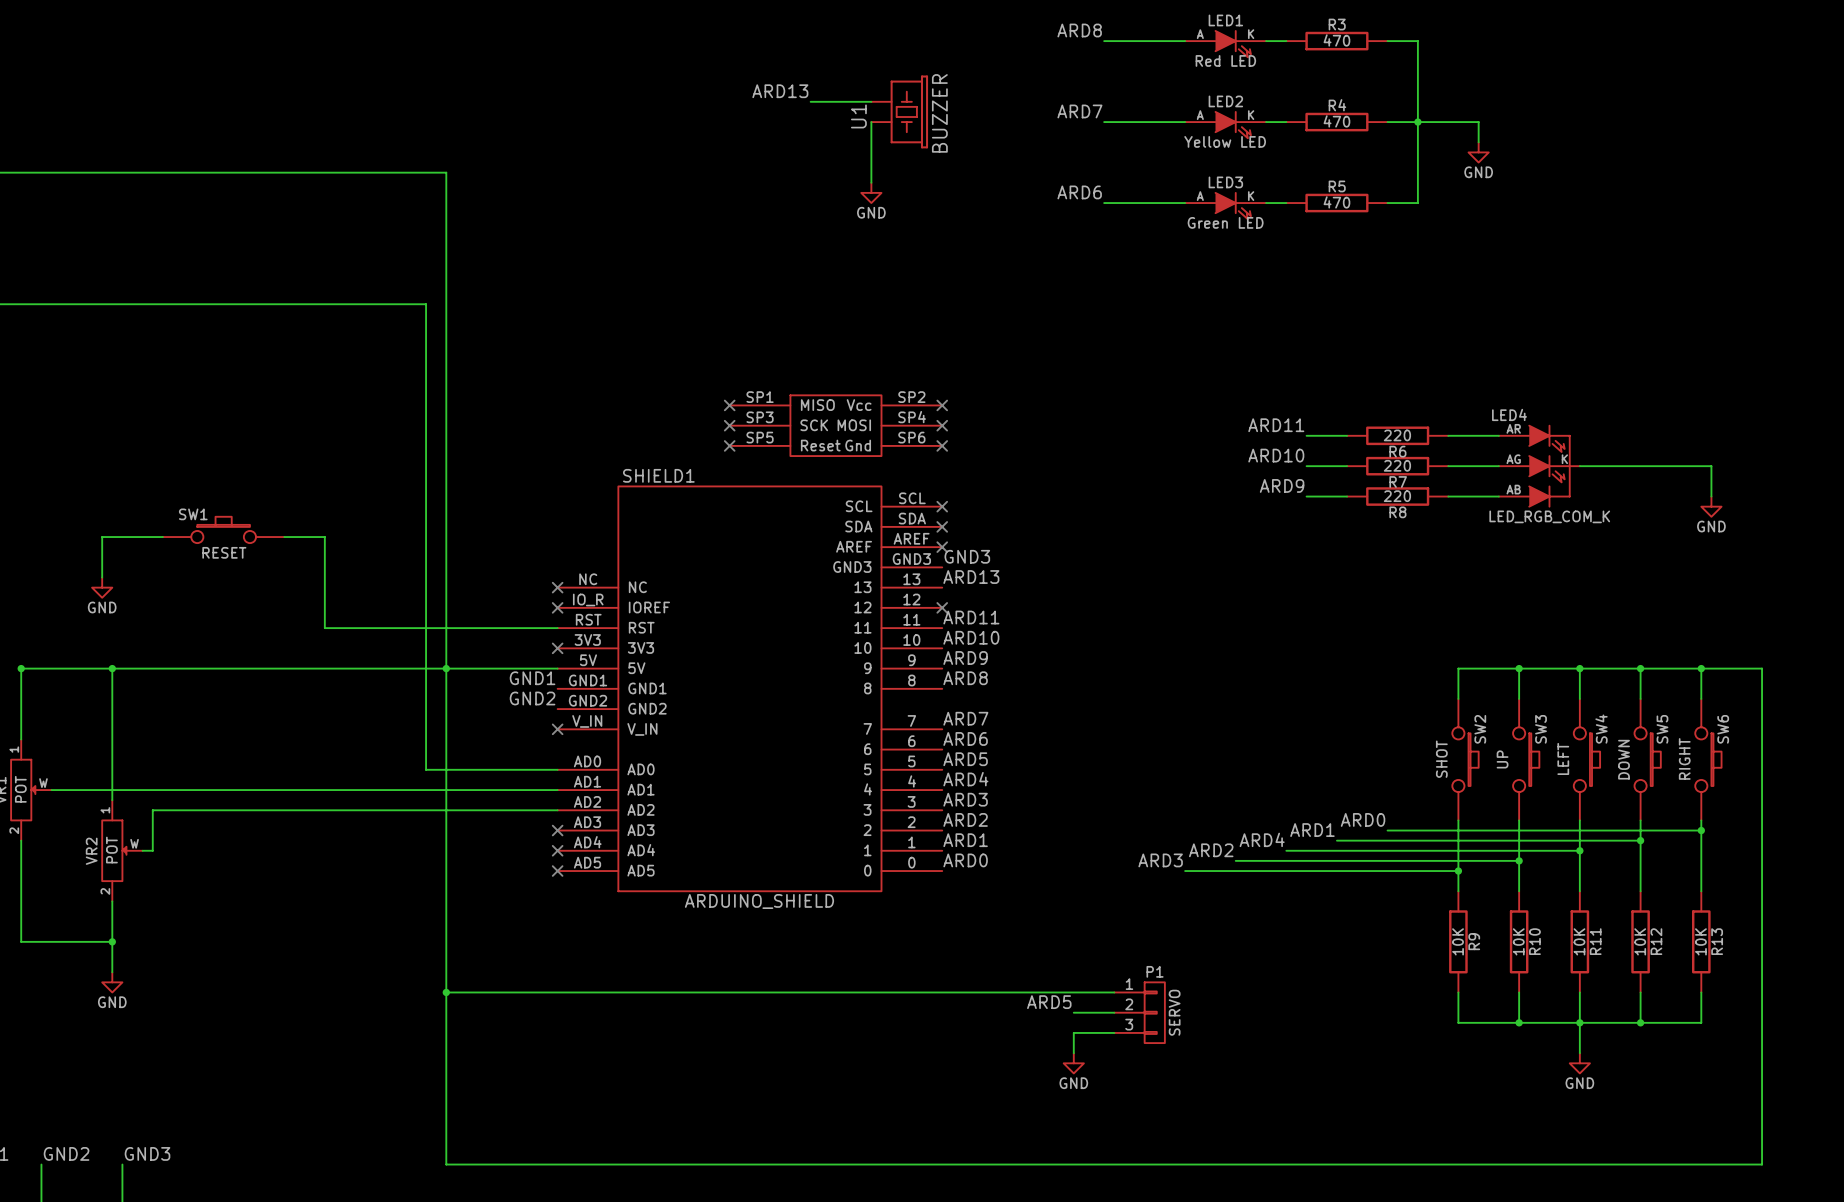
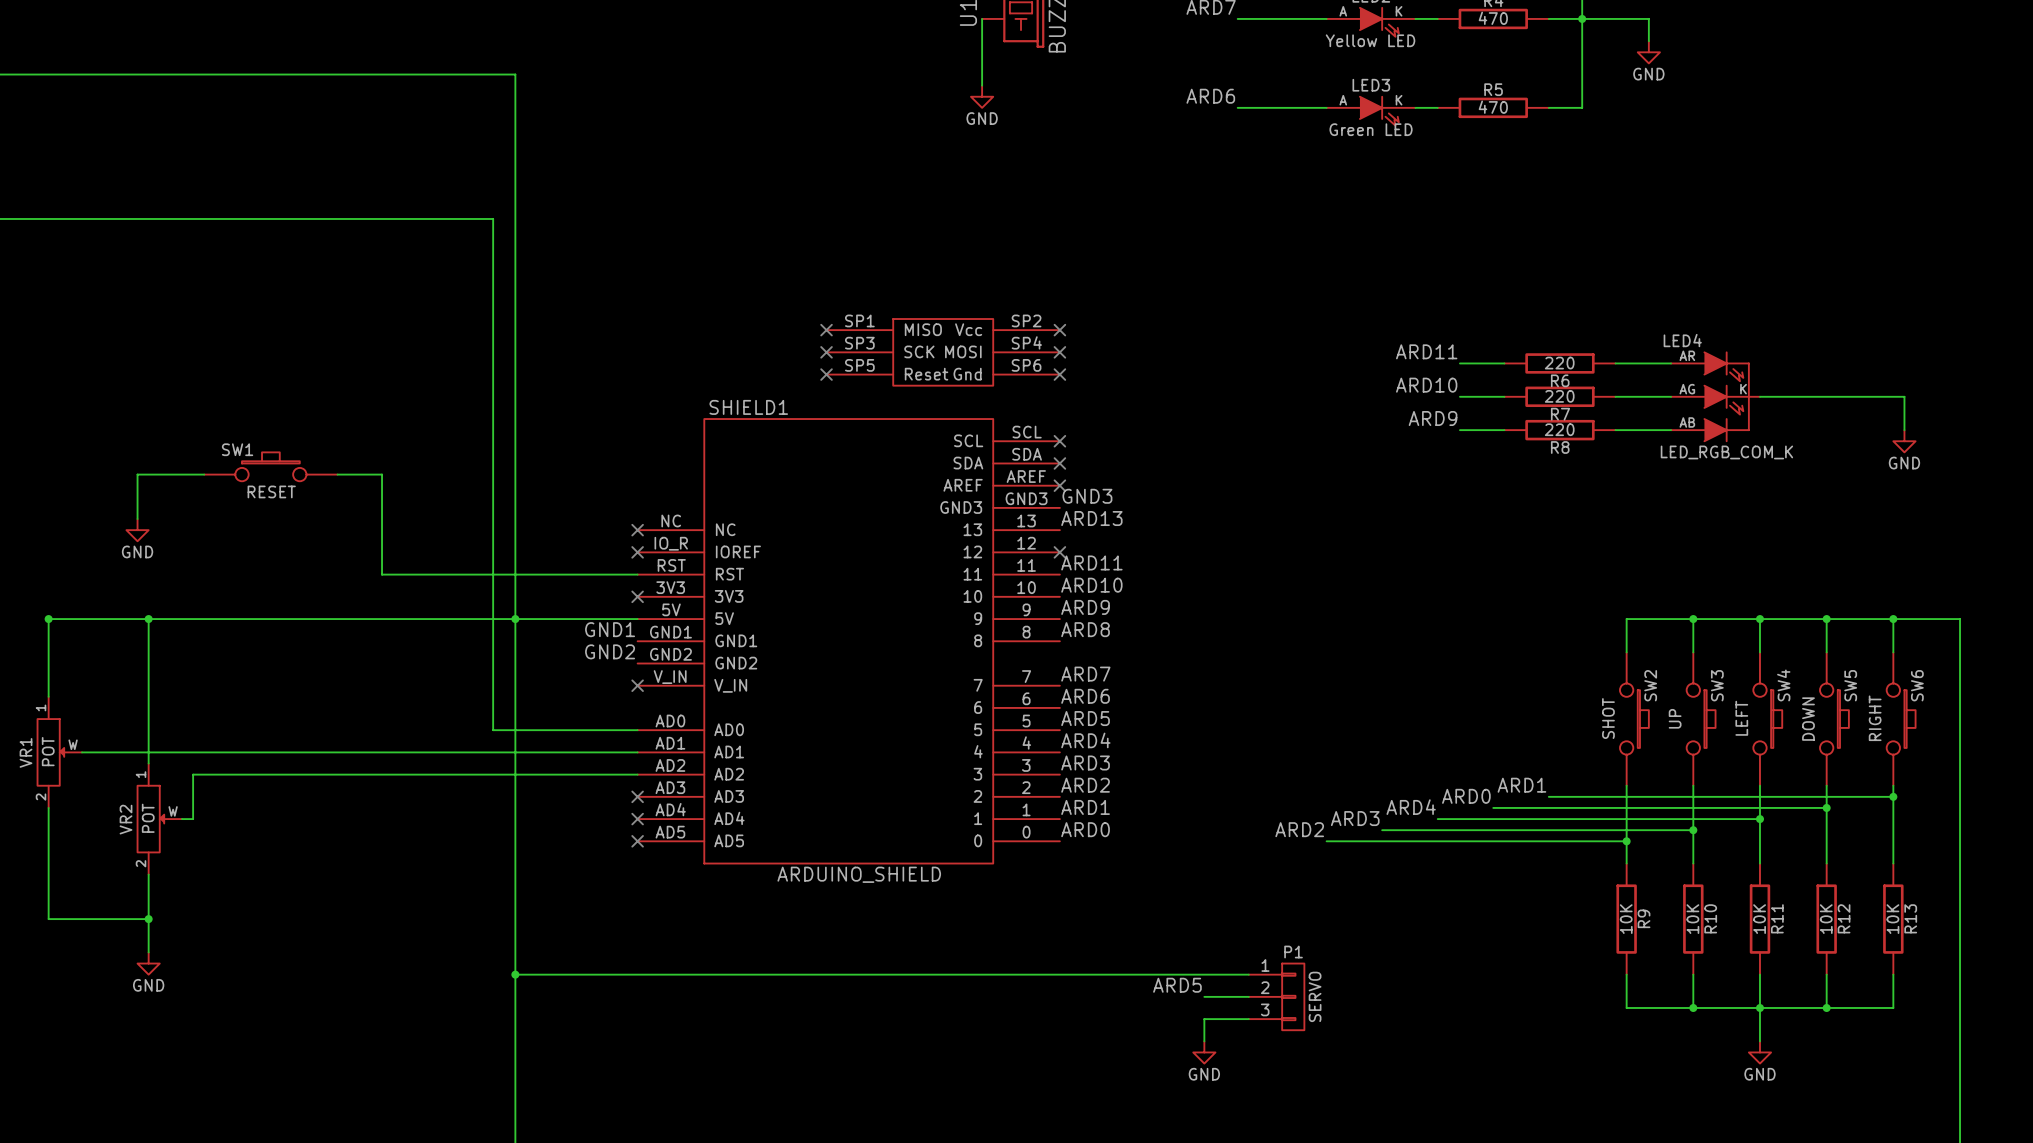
label: ARD0 (1363, 819) -> ARD1 (1521, 785)
label: ARD1 (1312, 830) -> ARD0 (1466, 796)
label: ARD2 (1211, 850) -> ARD3 (1355, 818)
label: ARD3 (1160, 860) -> ARD2 (1299, 829)

